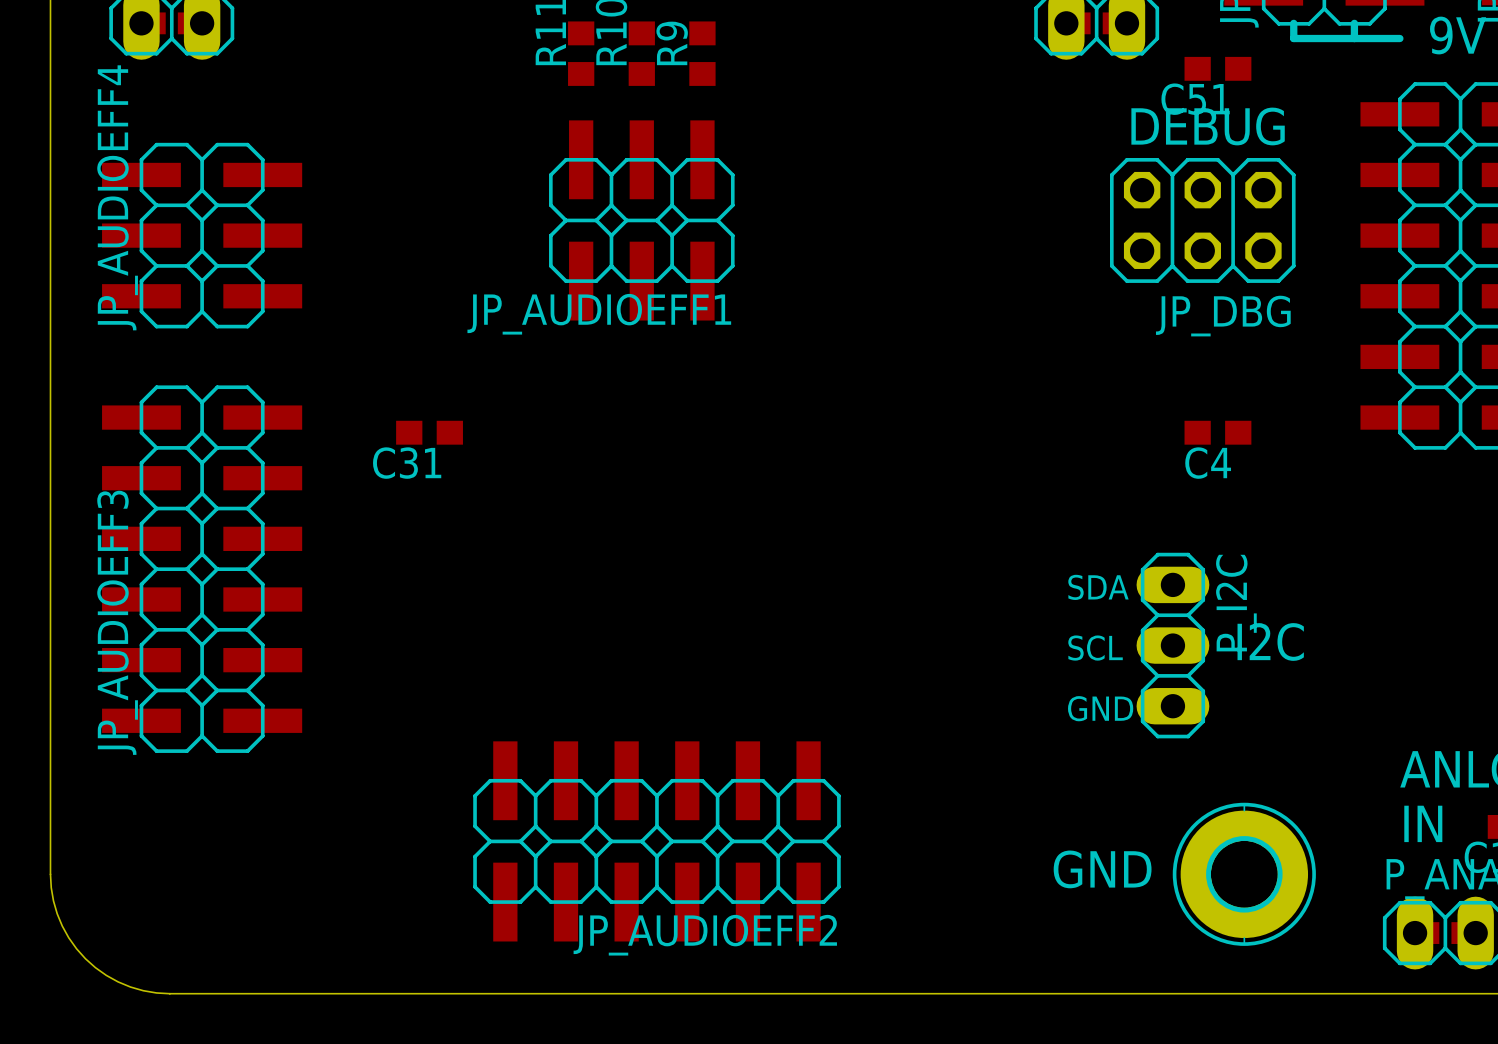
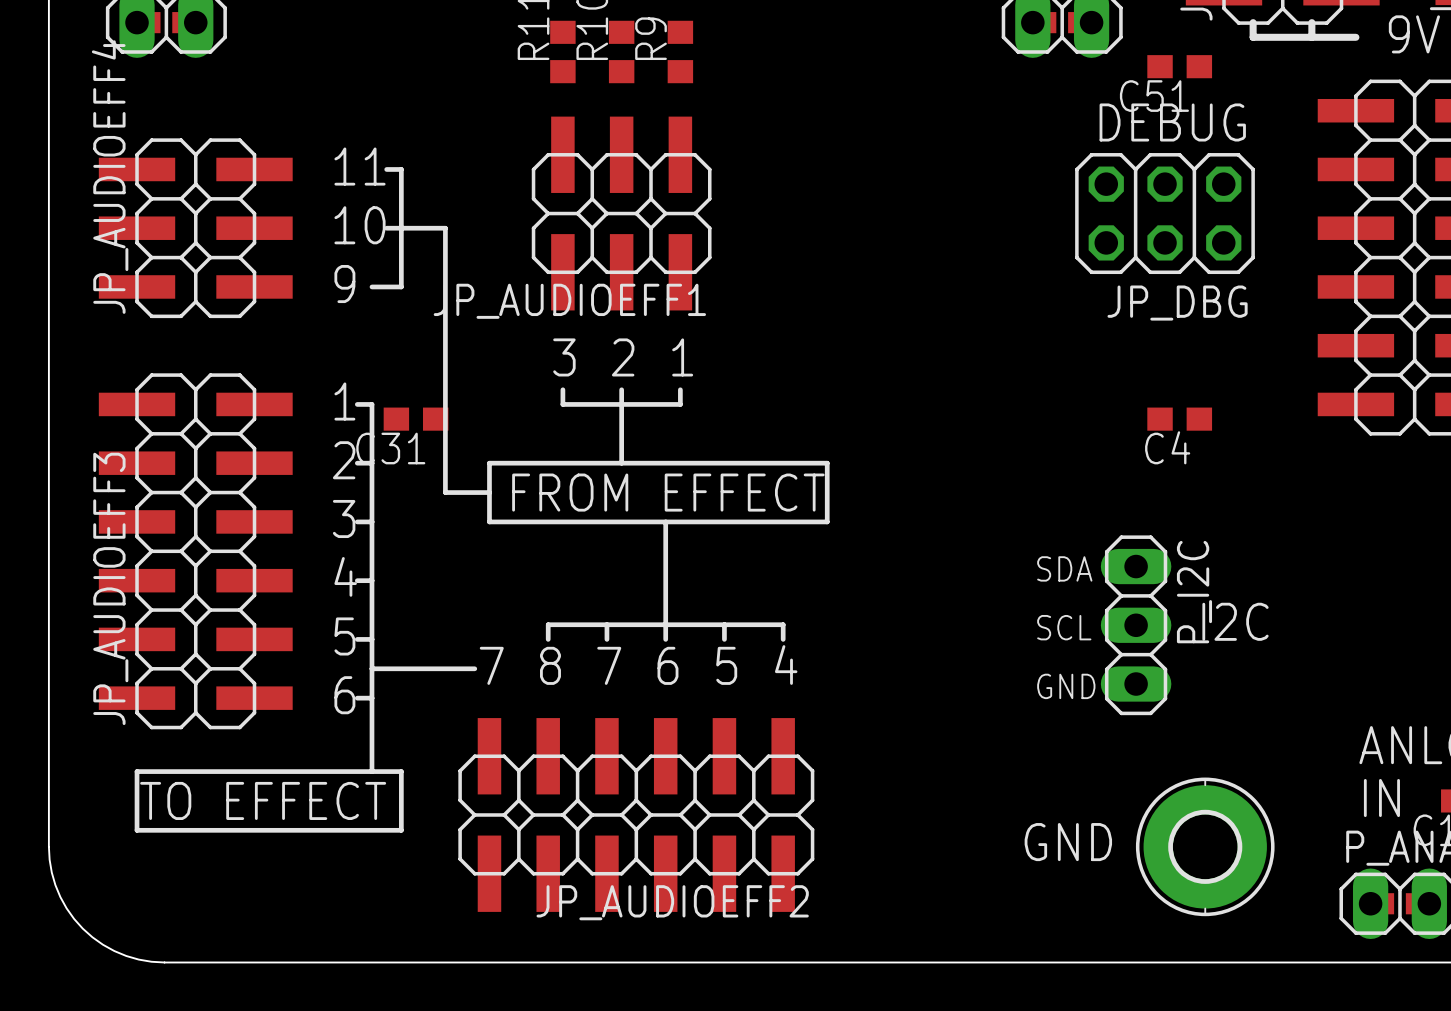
text: none -> 11 (360, 166)
line: none -> (386, 169) (401, 169) (401, 286) (371, 286)
text: none -> 10 (360, 225)
line: none -> (386, 228) (445, 228) (445, 492) (489, 492)
text: none -> 9 (344, 284)
text: none -> 2 (623, 357)
text: none -> 3 (564, 357)
text: none -> 1 (682, 357)
line: none -> (562, 389) (562, 404) (680, 404) (680, 389)
line: none -> (621, 389) (621, 463)
text: none -> 1 (344, 401)
line: none -> (357, 404) (371, 404) (371, 771)
text: none -> 2 (344, 460)
line: none -> (357, 463) (371, 463)
line: none -> (489, 463) (827, 463) (827, 521) (489, 521) (489, 463)
text: none -> FROM EFFECT (668, 492)
text: none -> 3 (344, 518)
line: none -> (357, 521) (371, 521)
line: none -> (665, 521) (665, 639)
text: none -> 4 (345, 576)
line: none -> (357, 580) (371, 580)
line: none -> (606, 624) (606, 639)
line: none -> (724, 624) (724, 639)
text: none -> 5 (344, 636)
line: none -> (357, 639) (371, 639)
line: none -> (548, 639) (548, 624) (783, 624) (783, 639)
text: none -> 7 (491, 665)
text: none -> 8 (550, 665)
text: none -> 7 (609, 665)
text: none -> 6 (667, 665)
text: none -> 5 (726, 665)
text: none -> 4 (786, 665)
line: none -> (371, 668) (474, 668)
text: none -> 6 (344, 695)
line: none -> (357, 698) (371, 698)
line: none -> (137, 771) (401, 771) (401, 830) (137, 830) (137, 771)
text: none -> TO EFFECT (263, 800)

